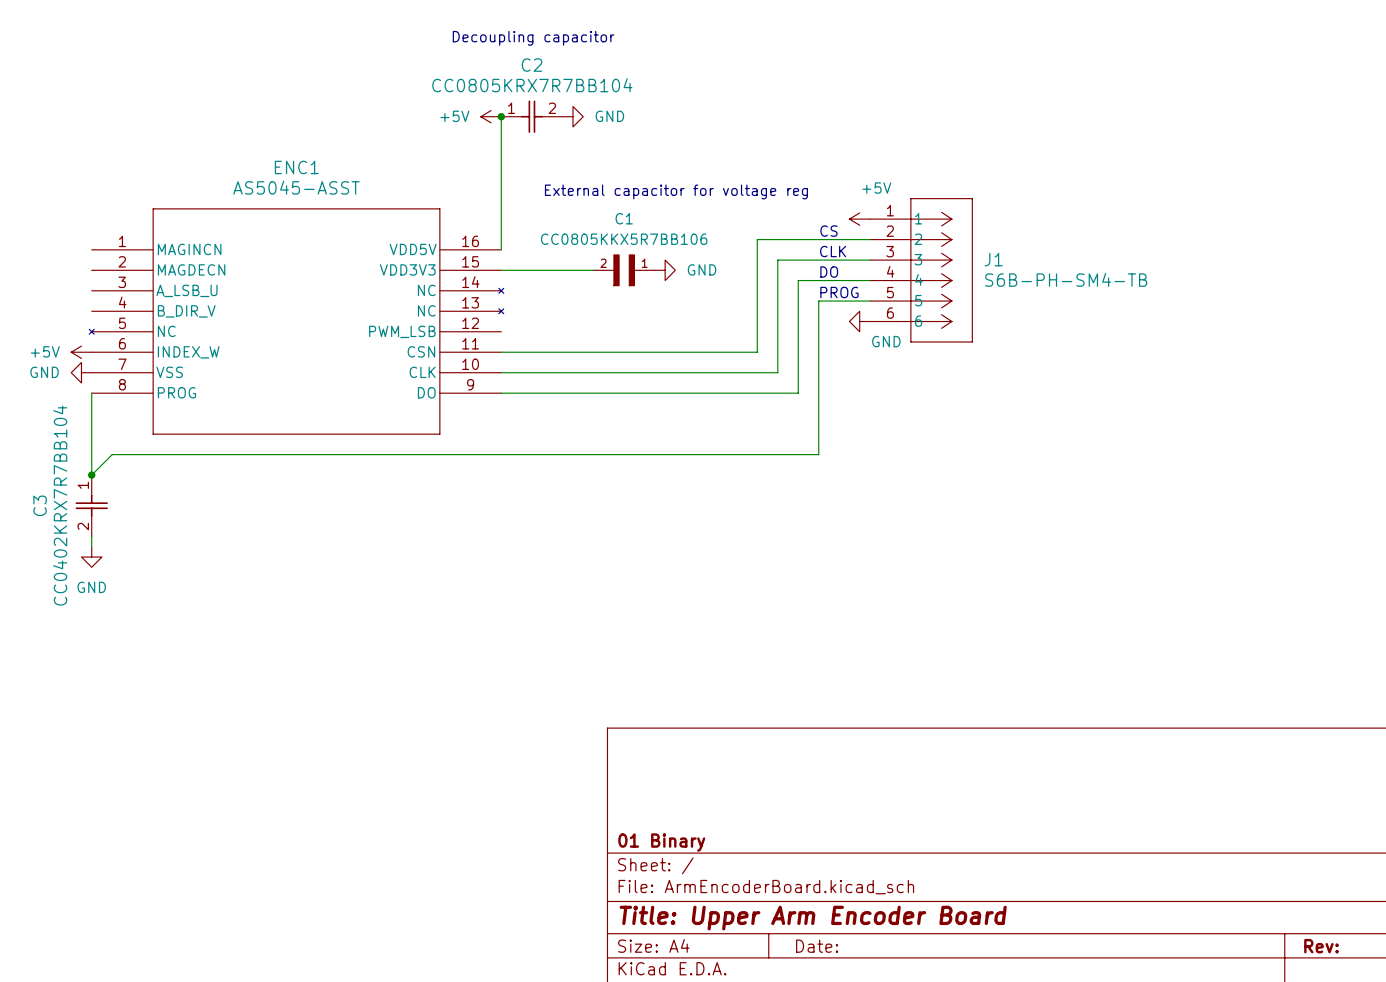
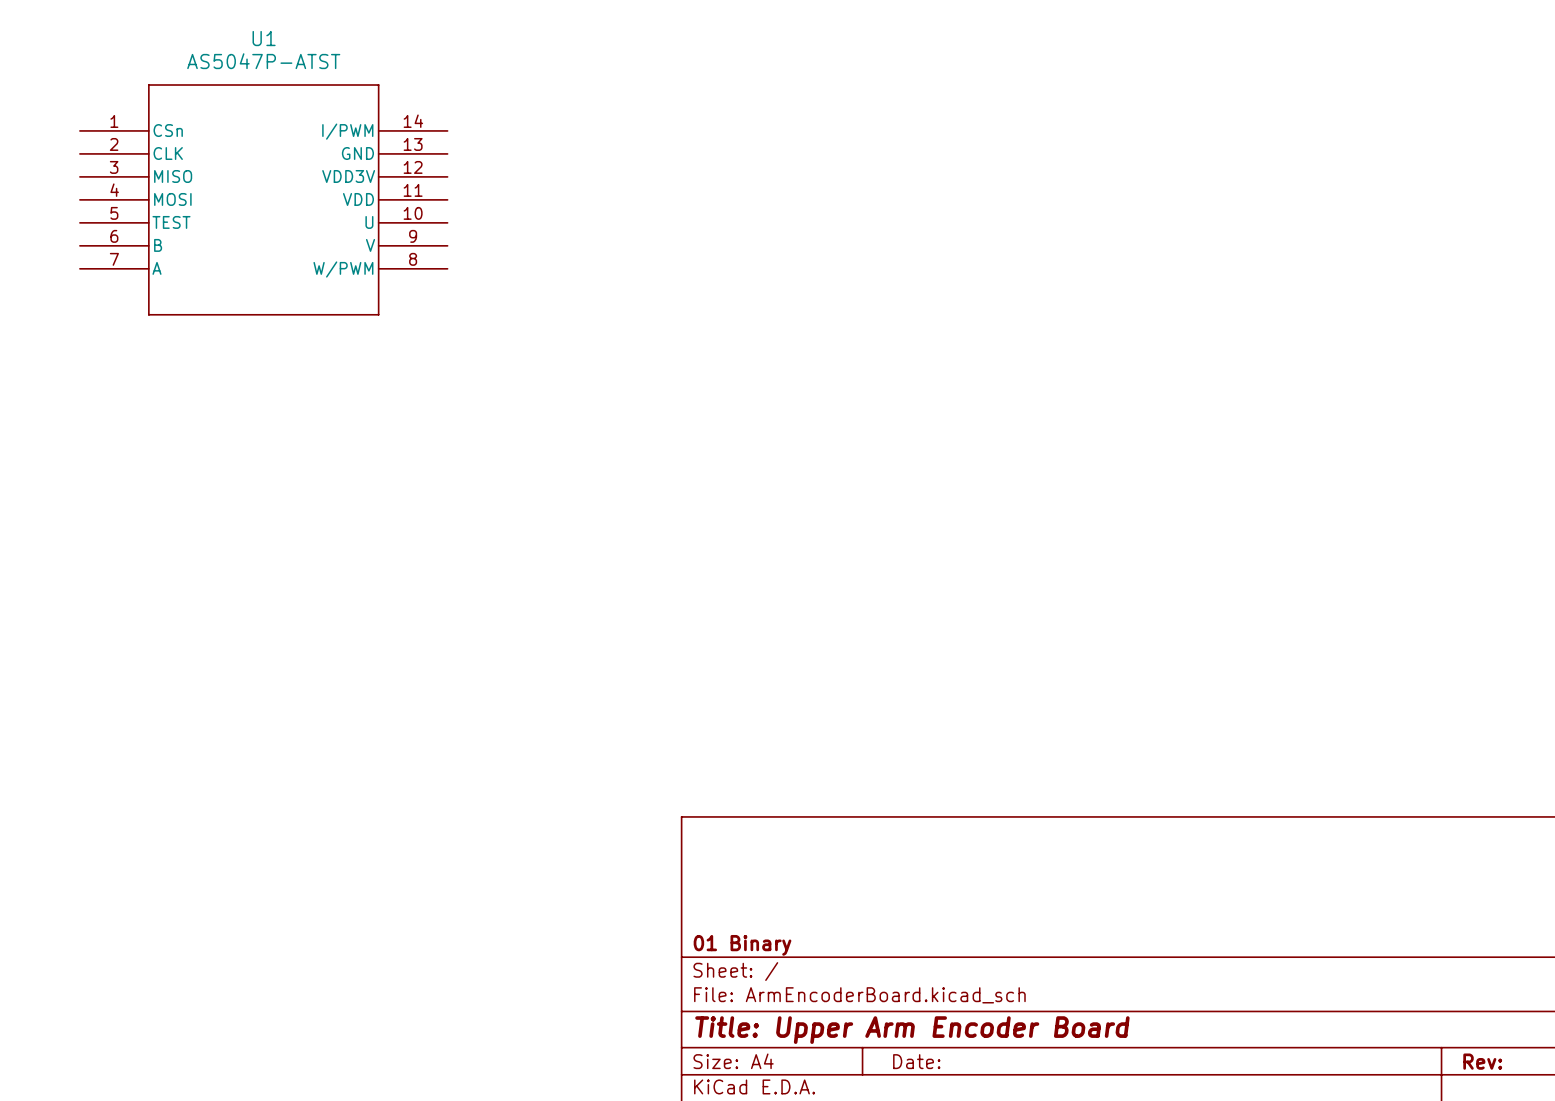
text: Decoupling capacitor (533, 38) -> none
power symbol: +5V (491, 116) -> none
wire: (501, 116) (501, 249) -> none
junction: (501, 116) -> none
C2: CC0805KRX7R7BB104 (532, 116) -> none
power symbol: GND (572, 116) -> none
U1: none -> AS5047P-ATST (263, 199)
text: External capacitor for voltage reg (676, 191) -> none
power symbol: +5V (859, 219) -> none
text: CS (828, 231) -> none
wire: (869, 239) (757, 239) (757, 352) (501, 352) -> none
text: CLK (833, 251) -> none
wire: (869, 260) (777, 260) (777, 372) (501, 372) -> none
wire: (501, 270) (593, 270) -> none
C1: CC0805KKX5R7BB106 (624, 270) -> none
power symbol: GND (665, 270) -> none
J1: S6B-PH-SM4-TB (921, 270) -> none
text: DO (829, 272) -> none
wire: (869, 280) (798, 280) (798, 393) (501, 393) -> none
text: PROG (839, 292) -> none
wire: (869, 301) (818, 301) (818, 454) (112, 454) (91, 475) (91, 393) -> none
ENC1: AS5045-ASST (296, 321) -> none
power symbol: GND (859, 321) -> none
power symbol: +5V (81, 352) -> none
power symbol: GND (81, 372) -> none
junction: (91, 475) -> none
C3: CC0402KRX7R7BB104 (91, 505) -> none
wire: (91, 536) (91, 546) -> none
power symbol: GND (91, 557) -> none

